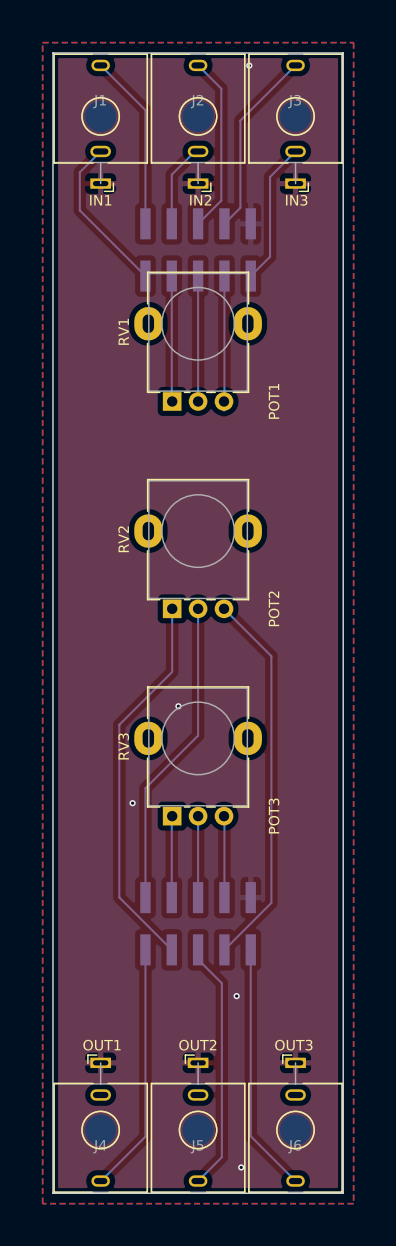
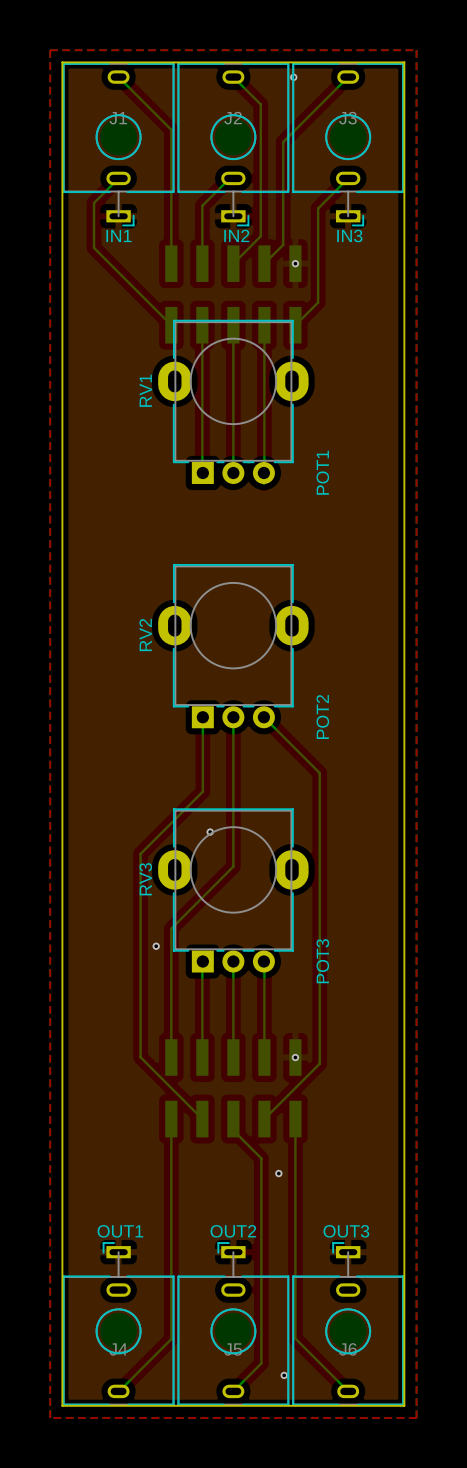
via: none -> (295, 263)
via: none -> (295, 1057)

